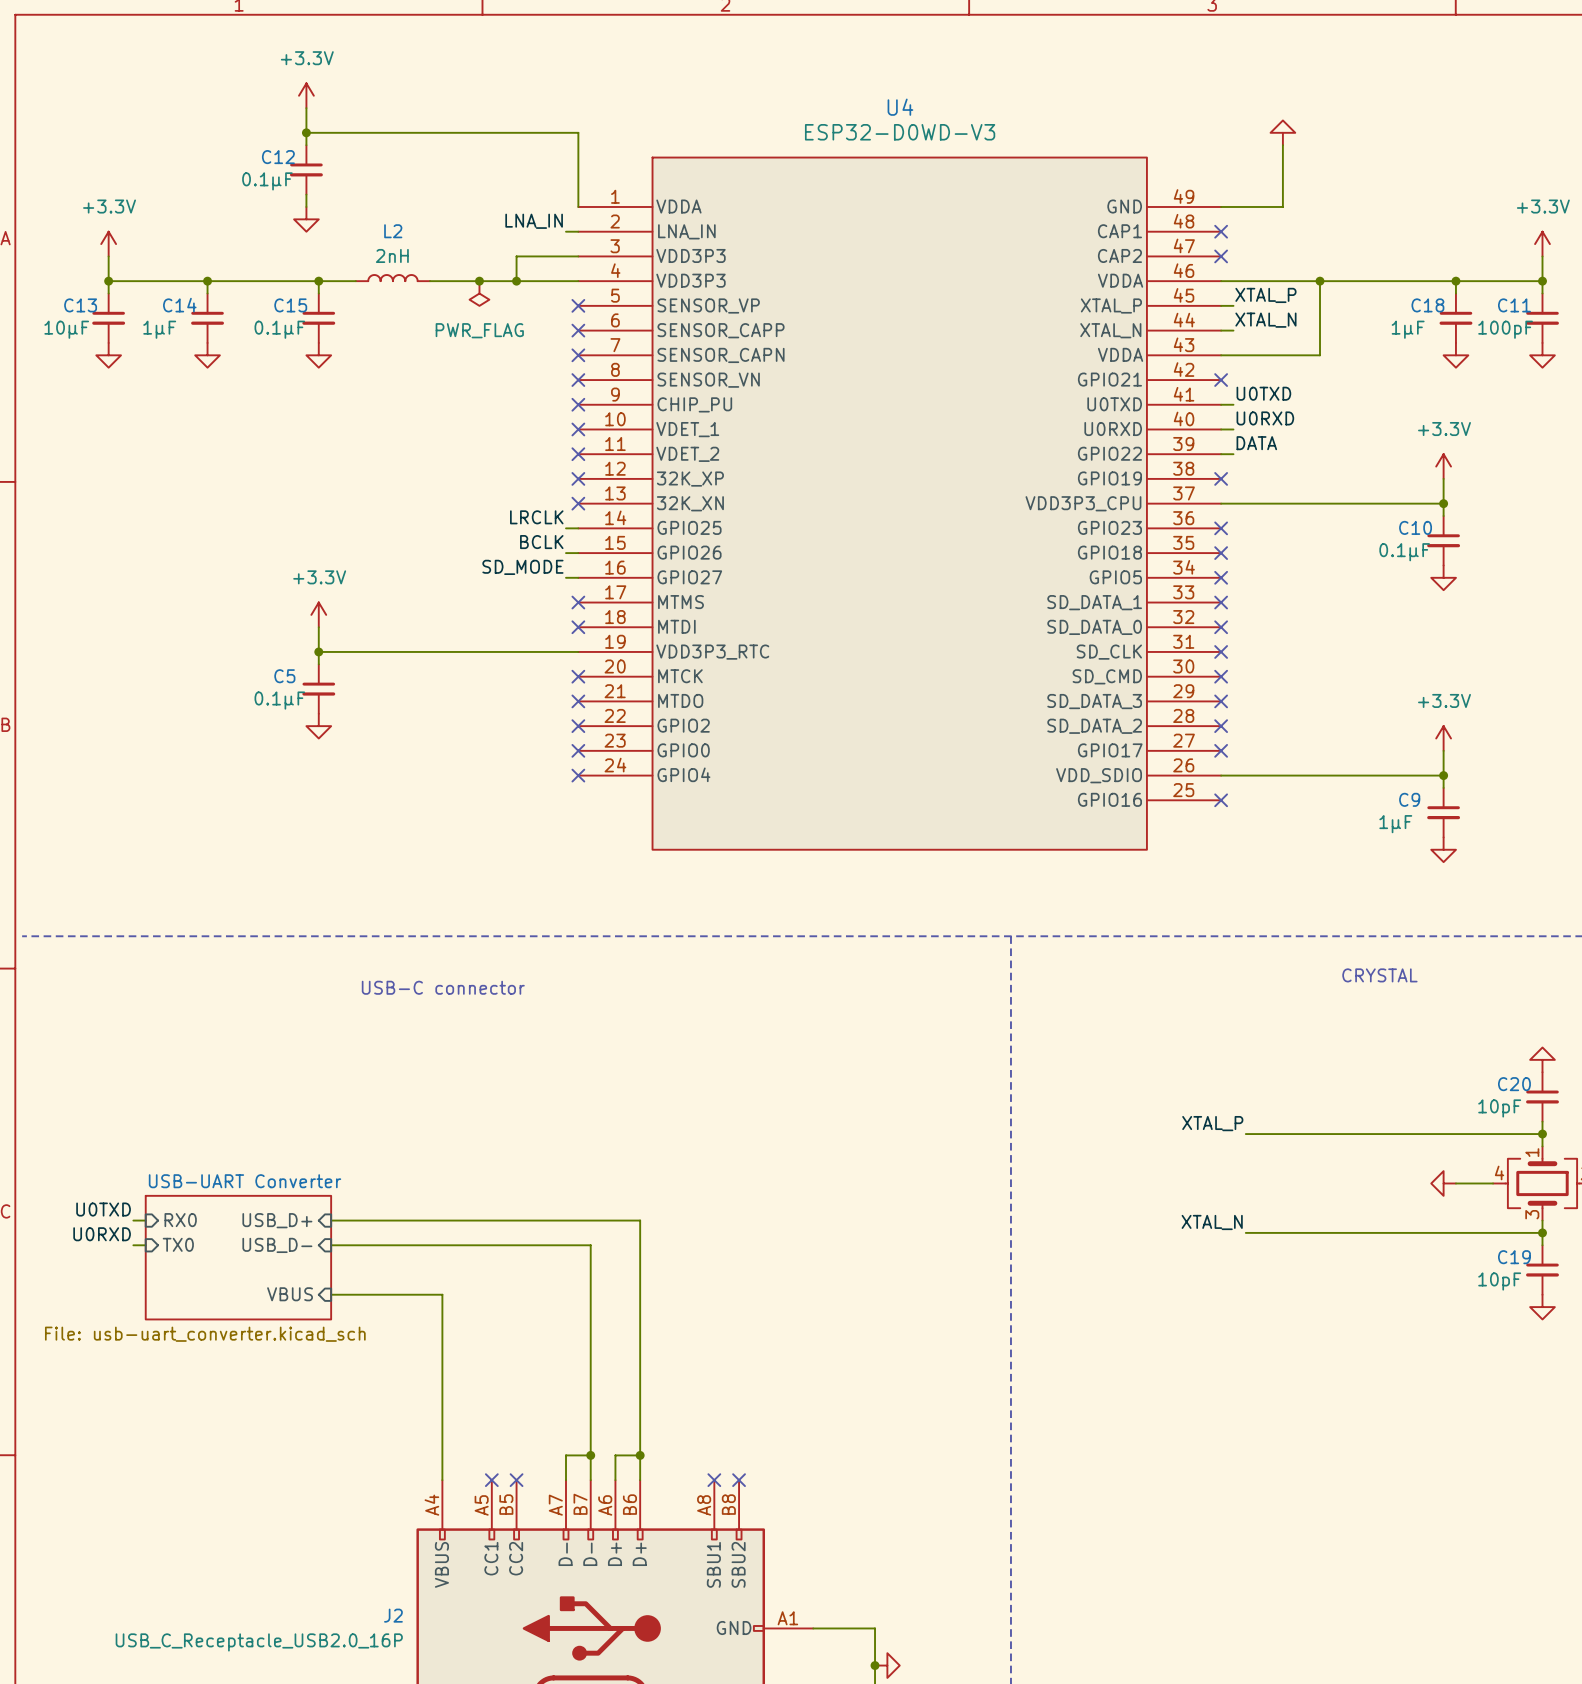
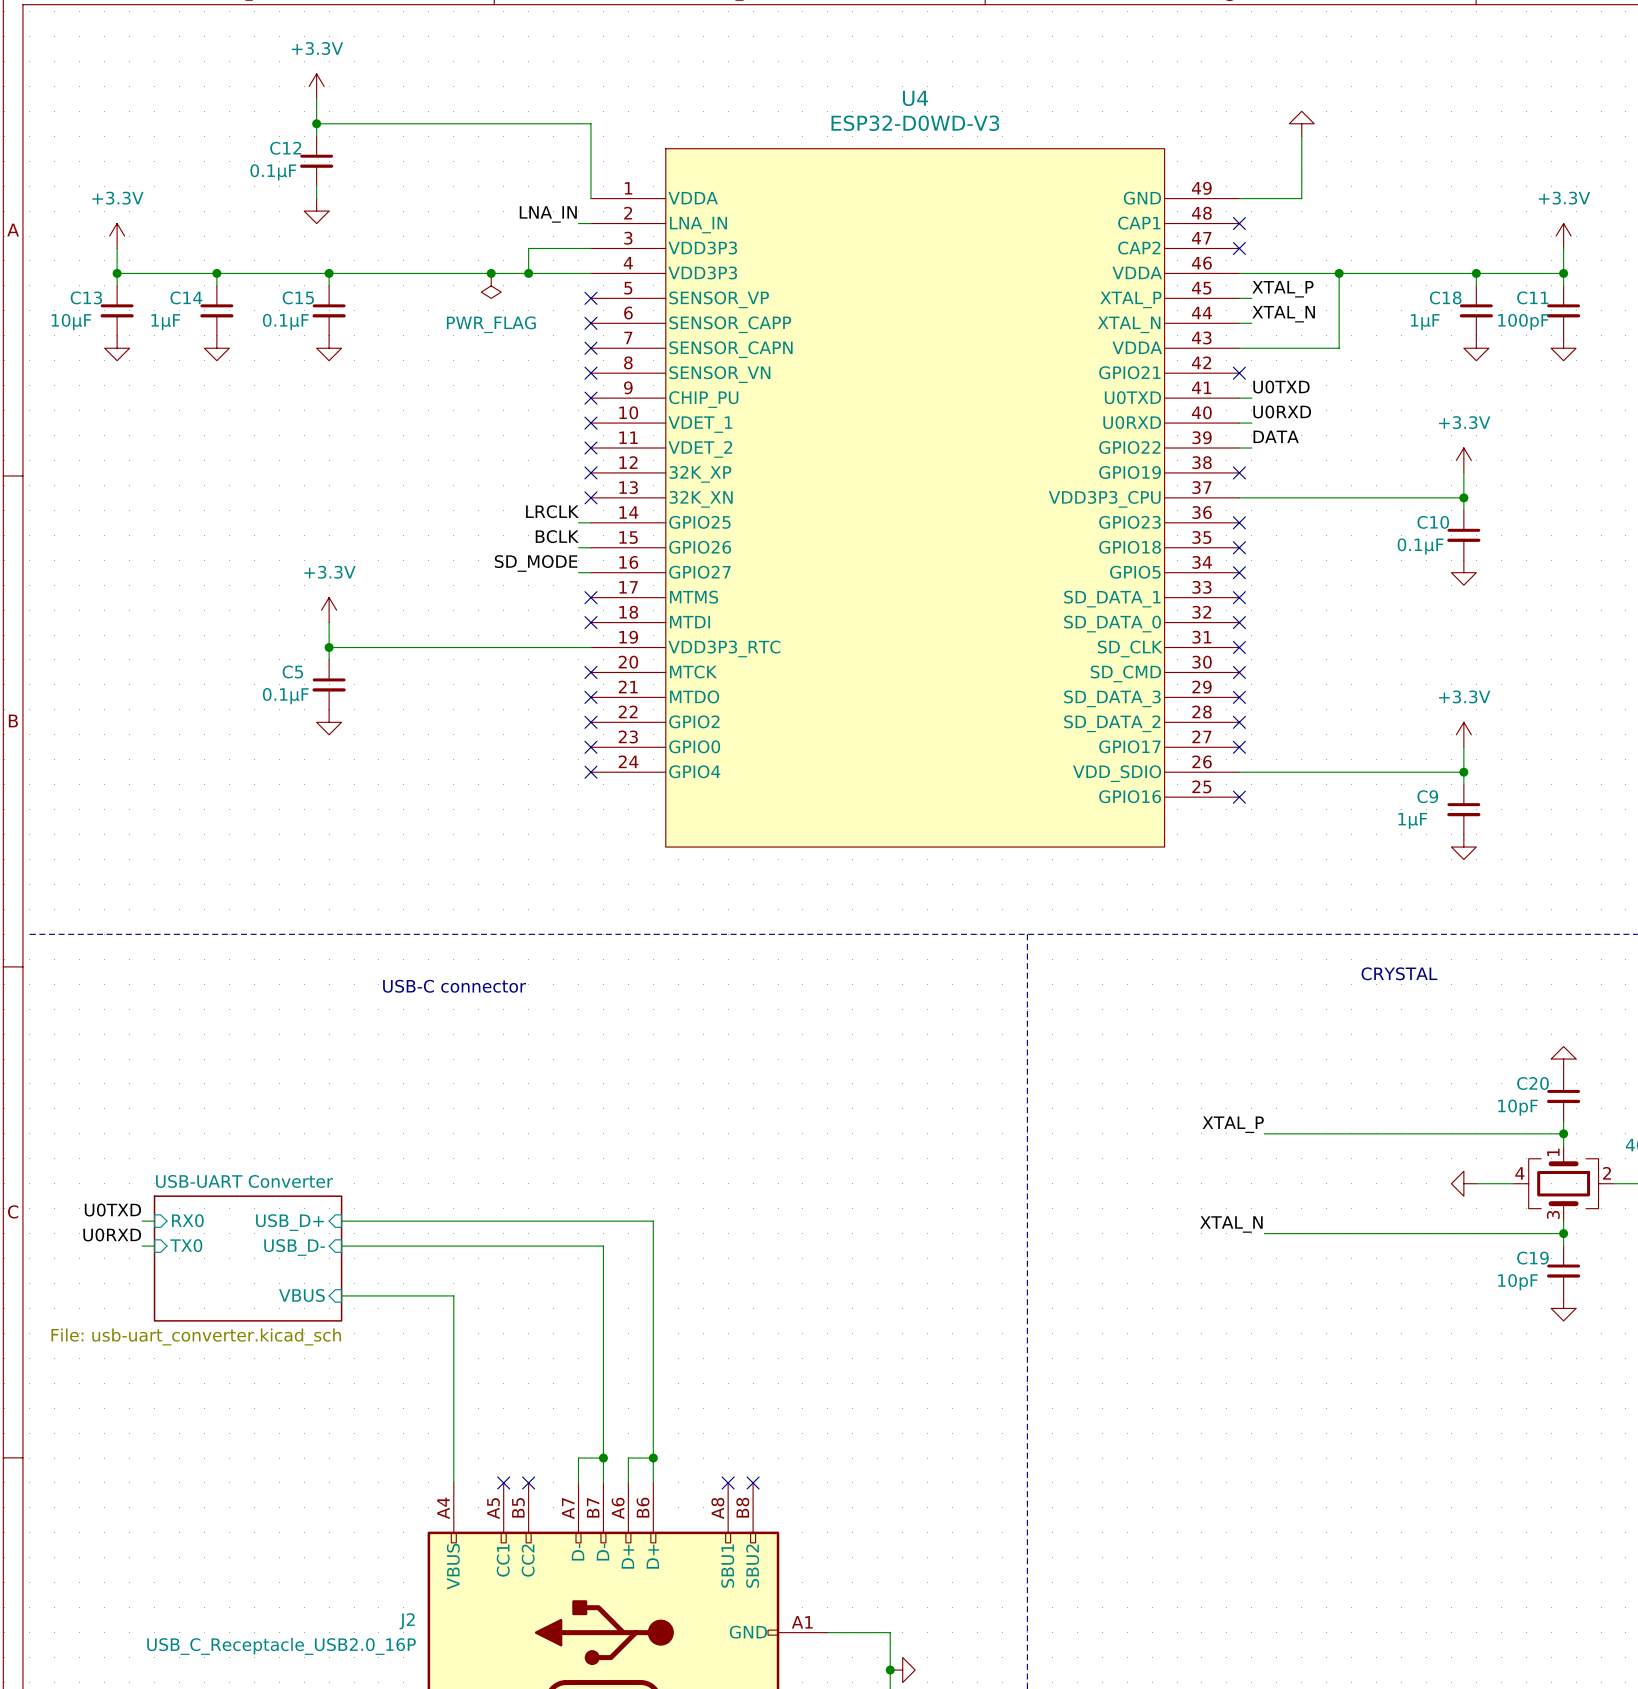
L2: 2nH (392, 278) -> none
wire: none -> (366, 273) (441, 273)

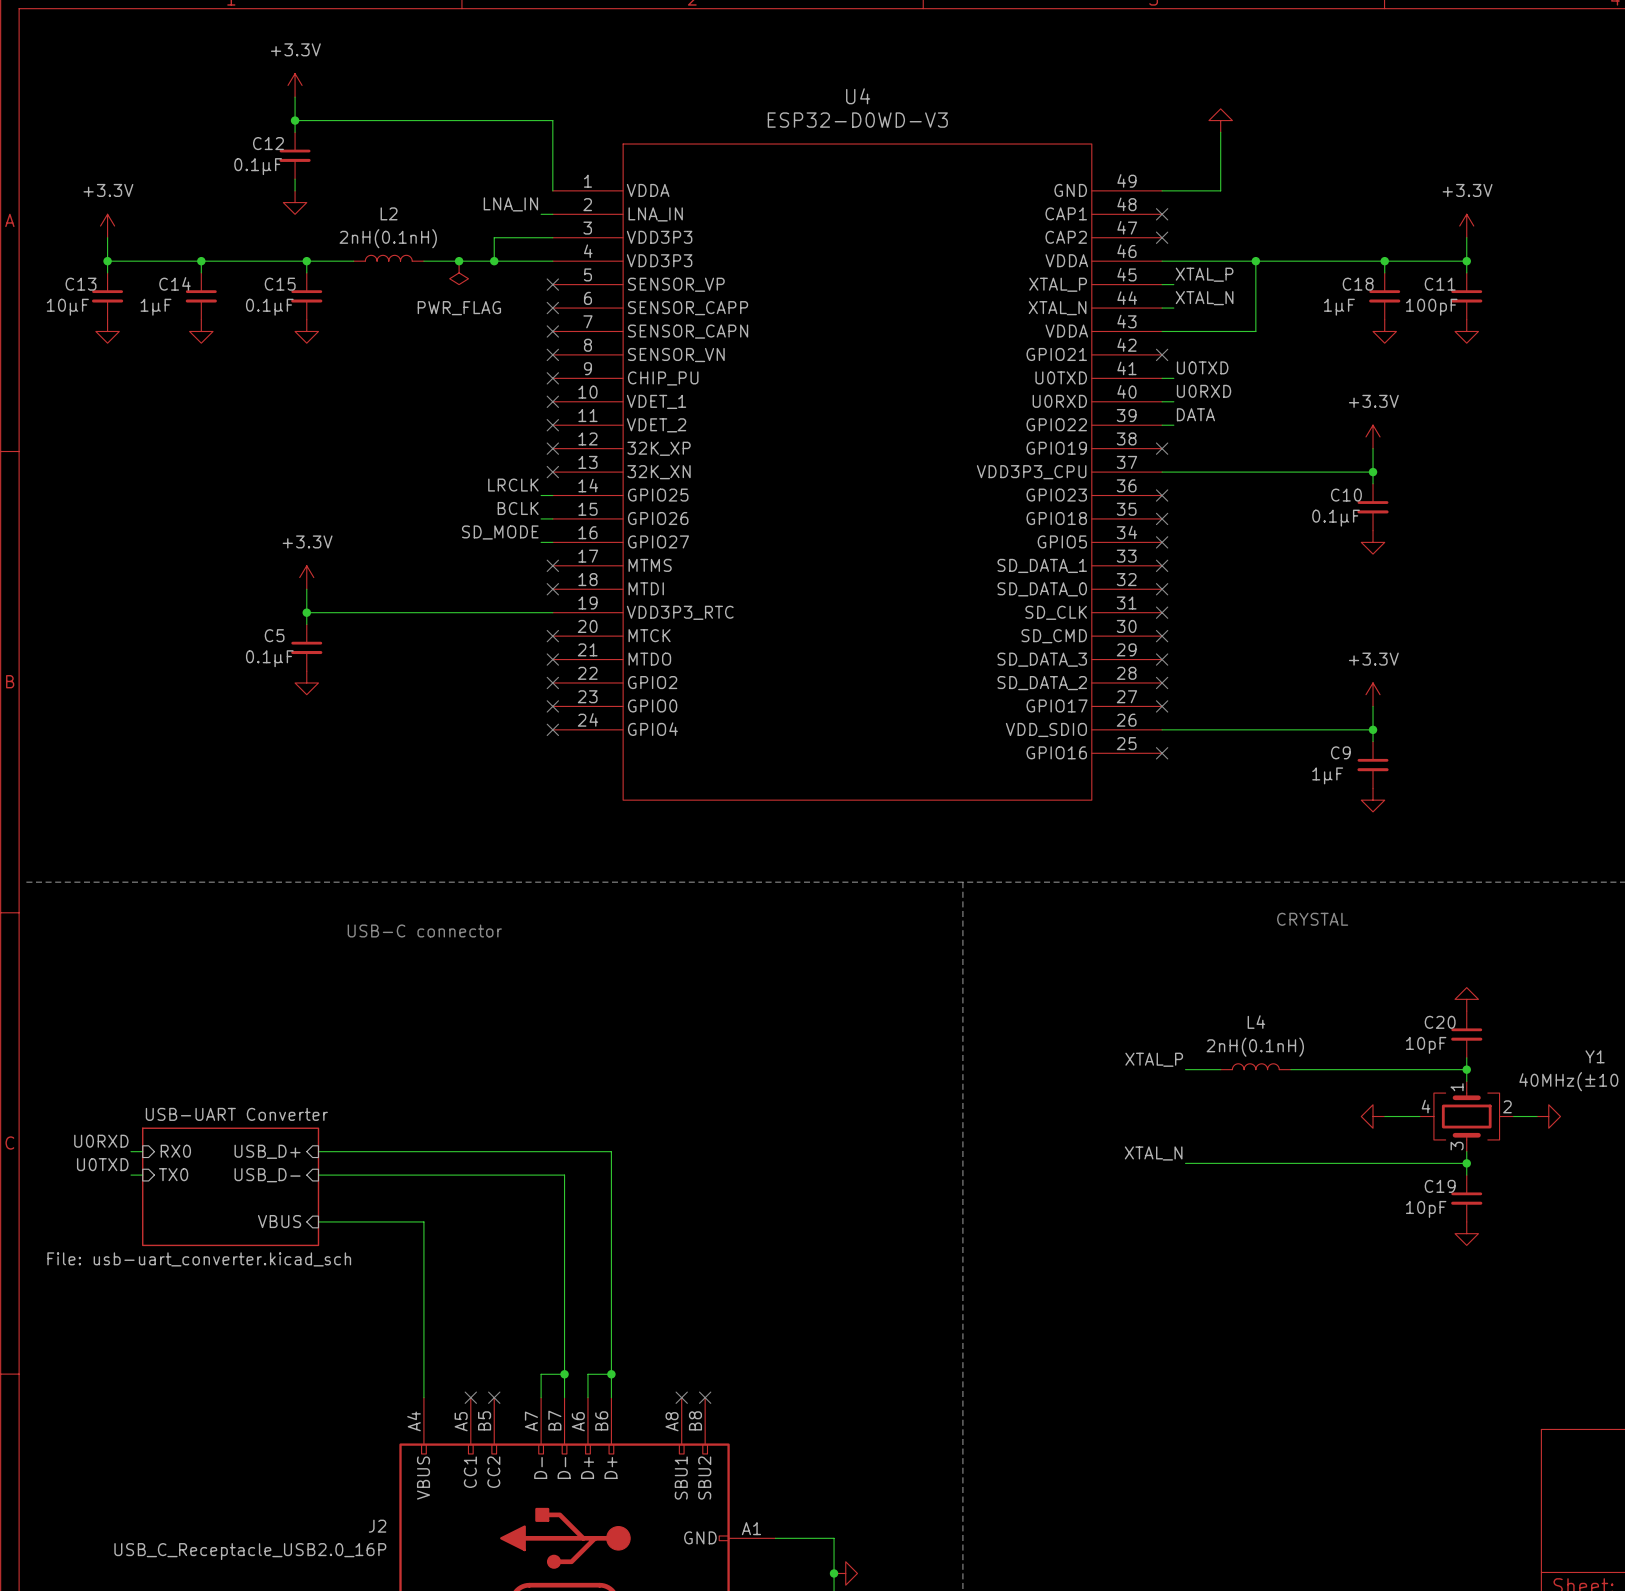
L2: none -> 2nH(0.1nH) (388, 258)
wire: (378, 273) (453, 273) -> none
L4: none -> 2nH(0.1nH) (1255, 1066)
wire: (1301, 1133) (1376, 1133) -> none
label: U0TXD (112, 1210) -> U0RXD (101, 1141)
label: U0RXD (112, 1234) -> U0TXD (102, 1164)

